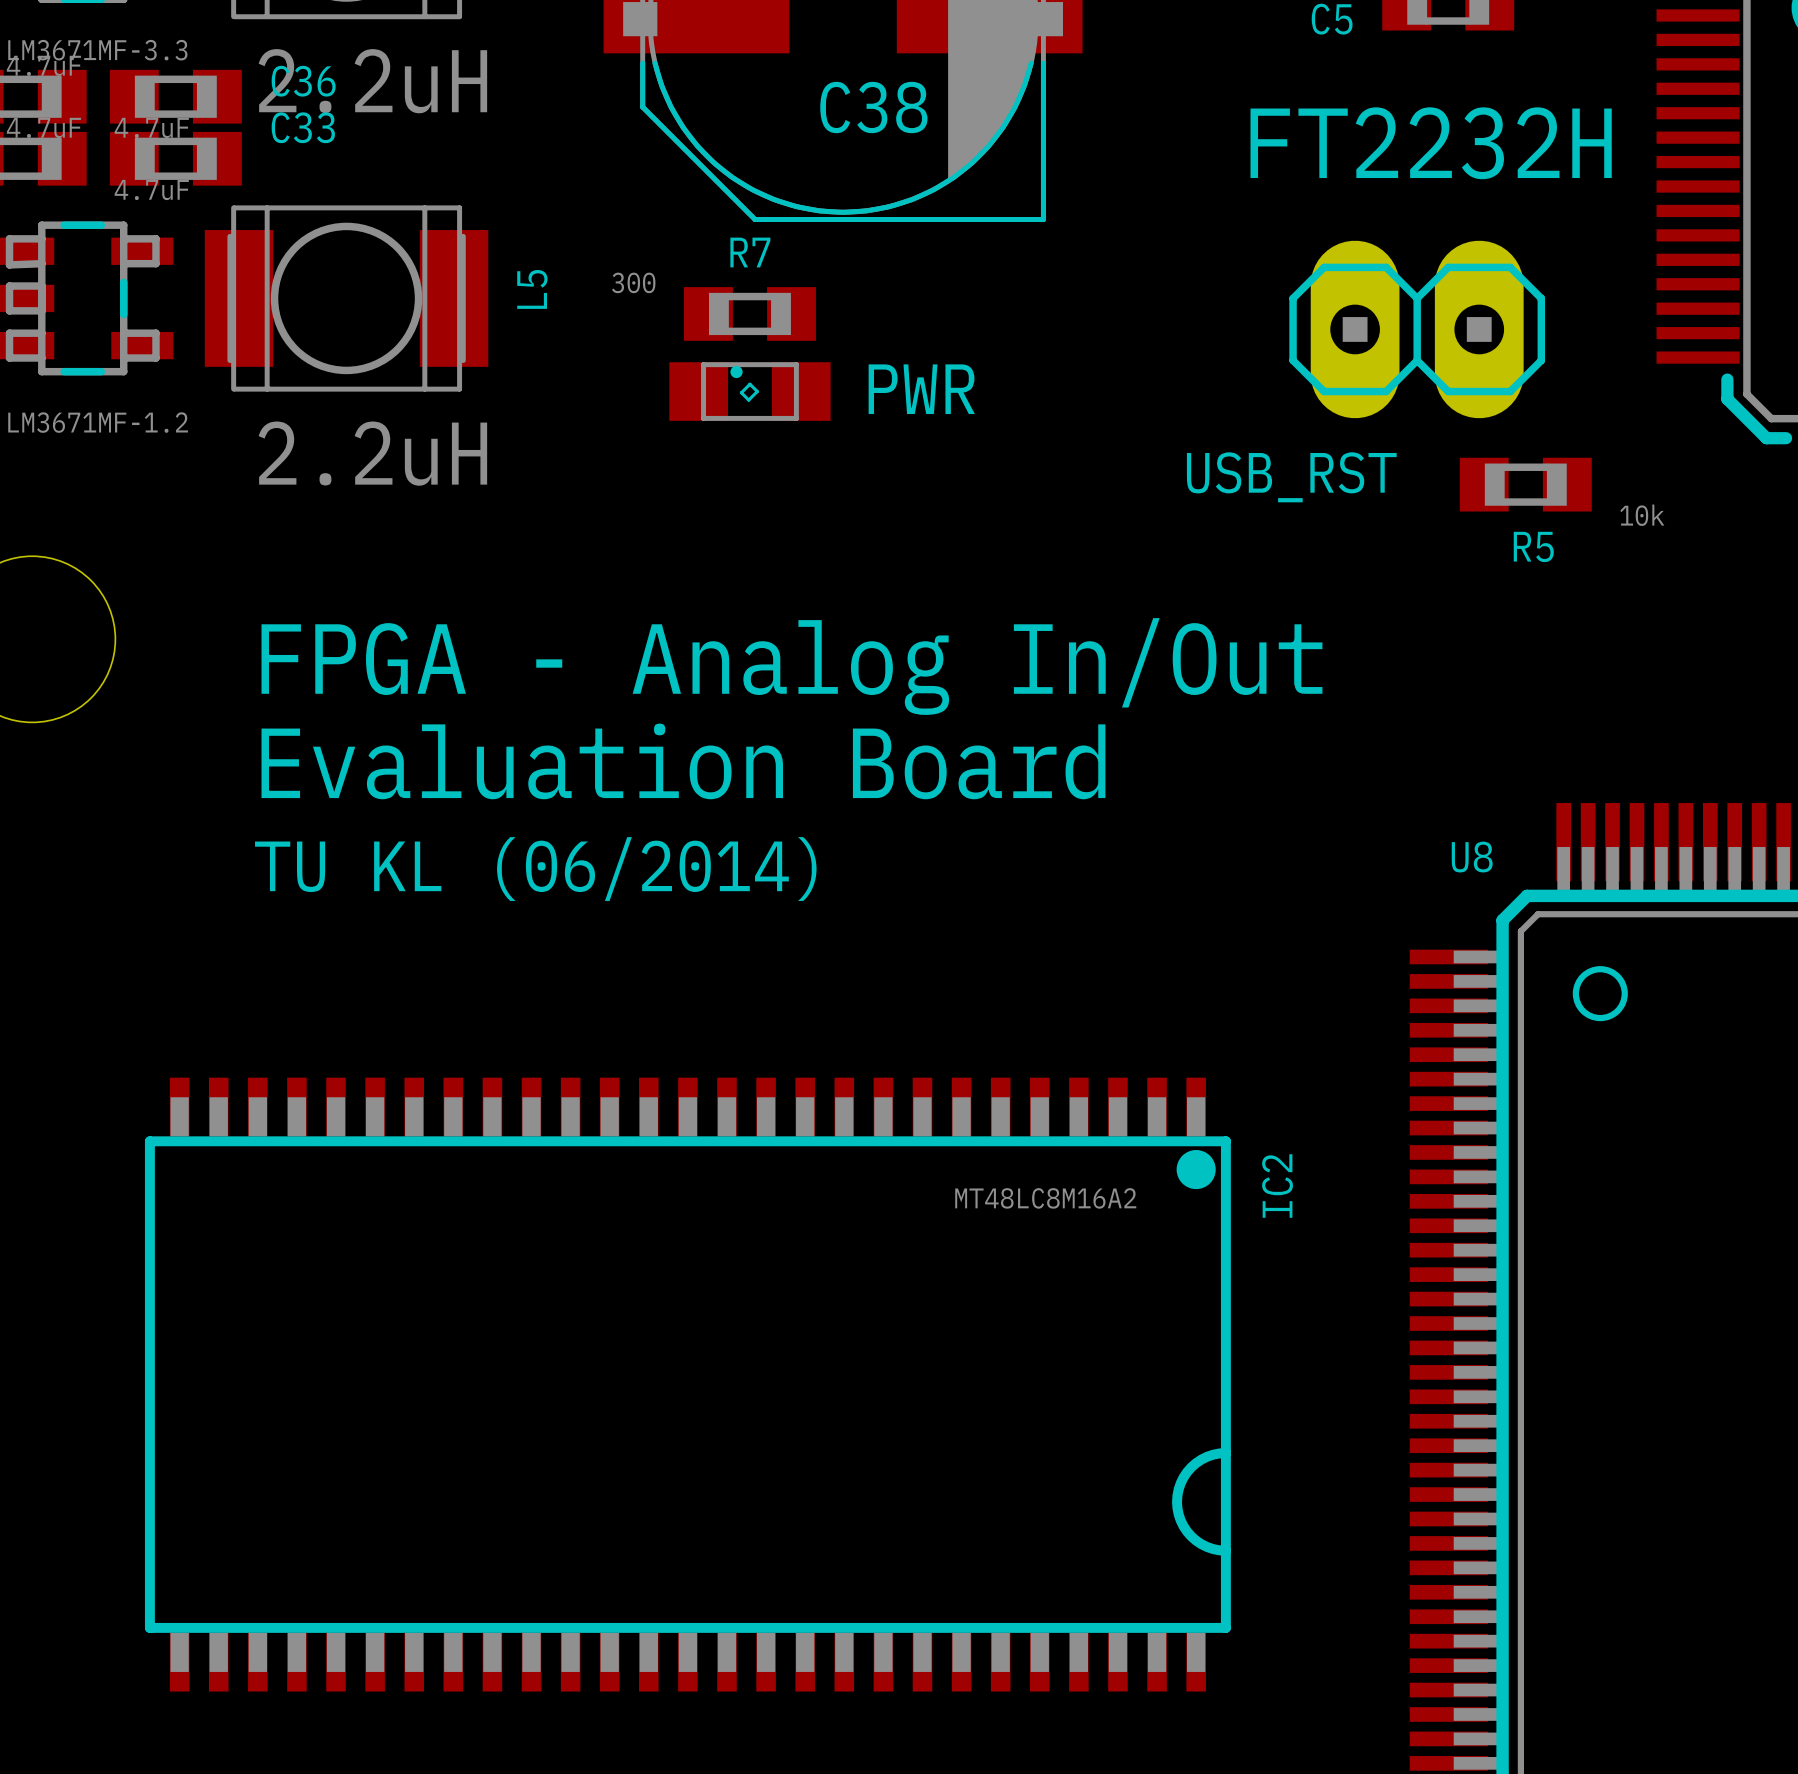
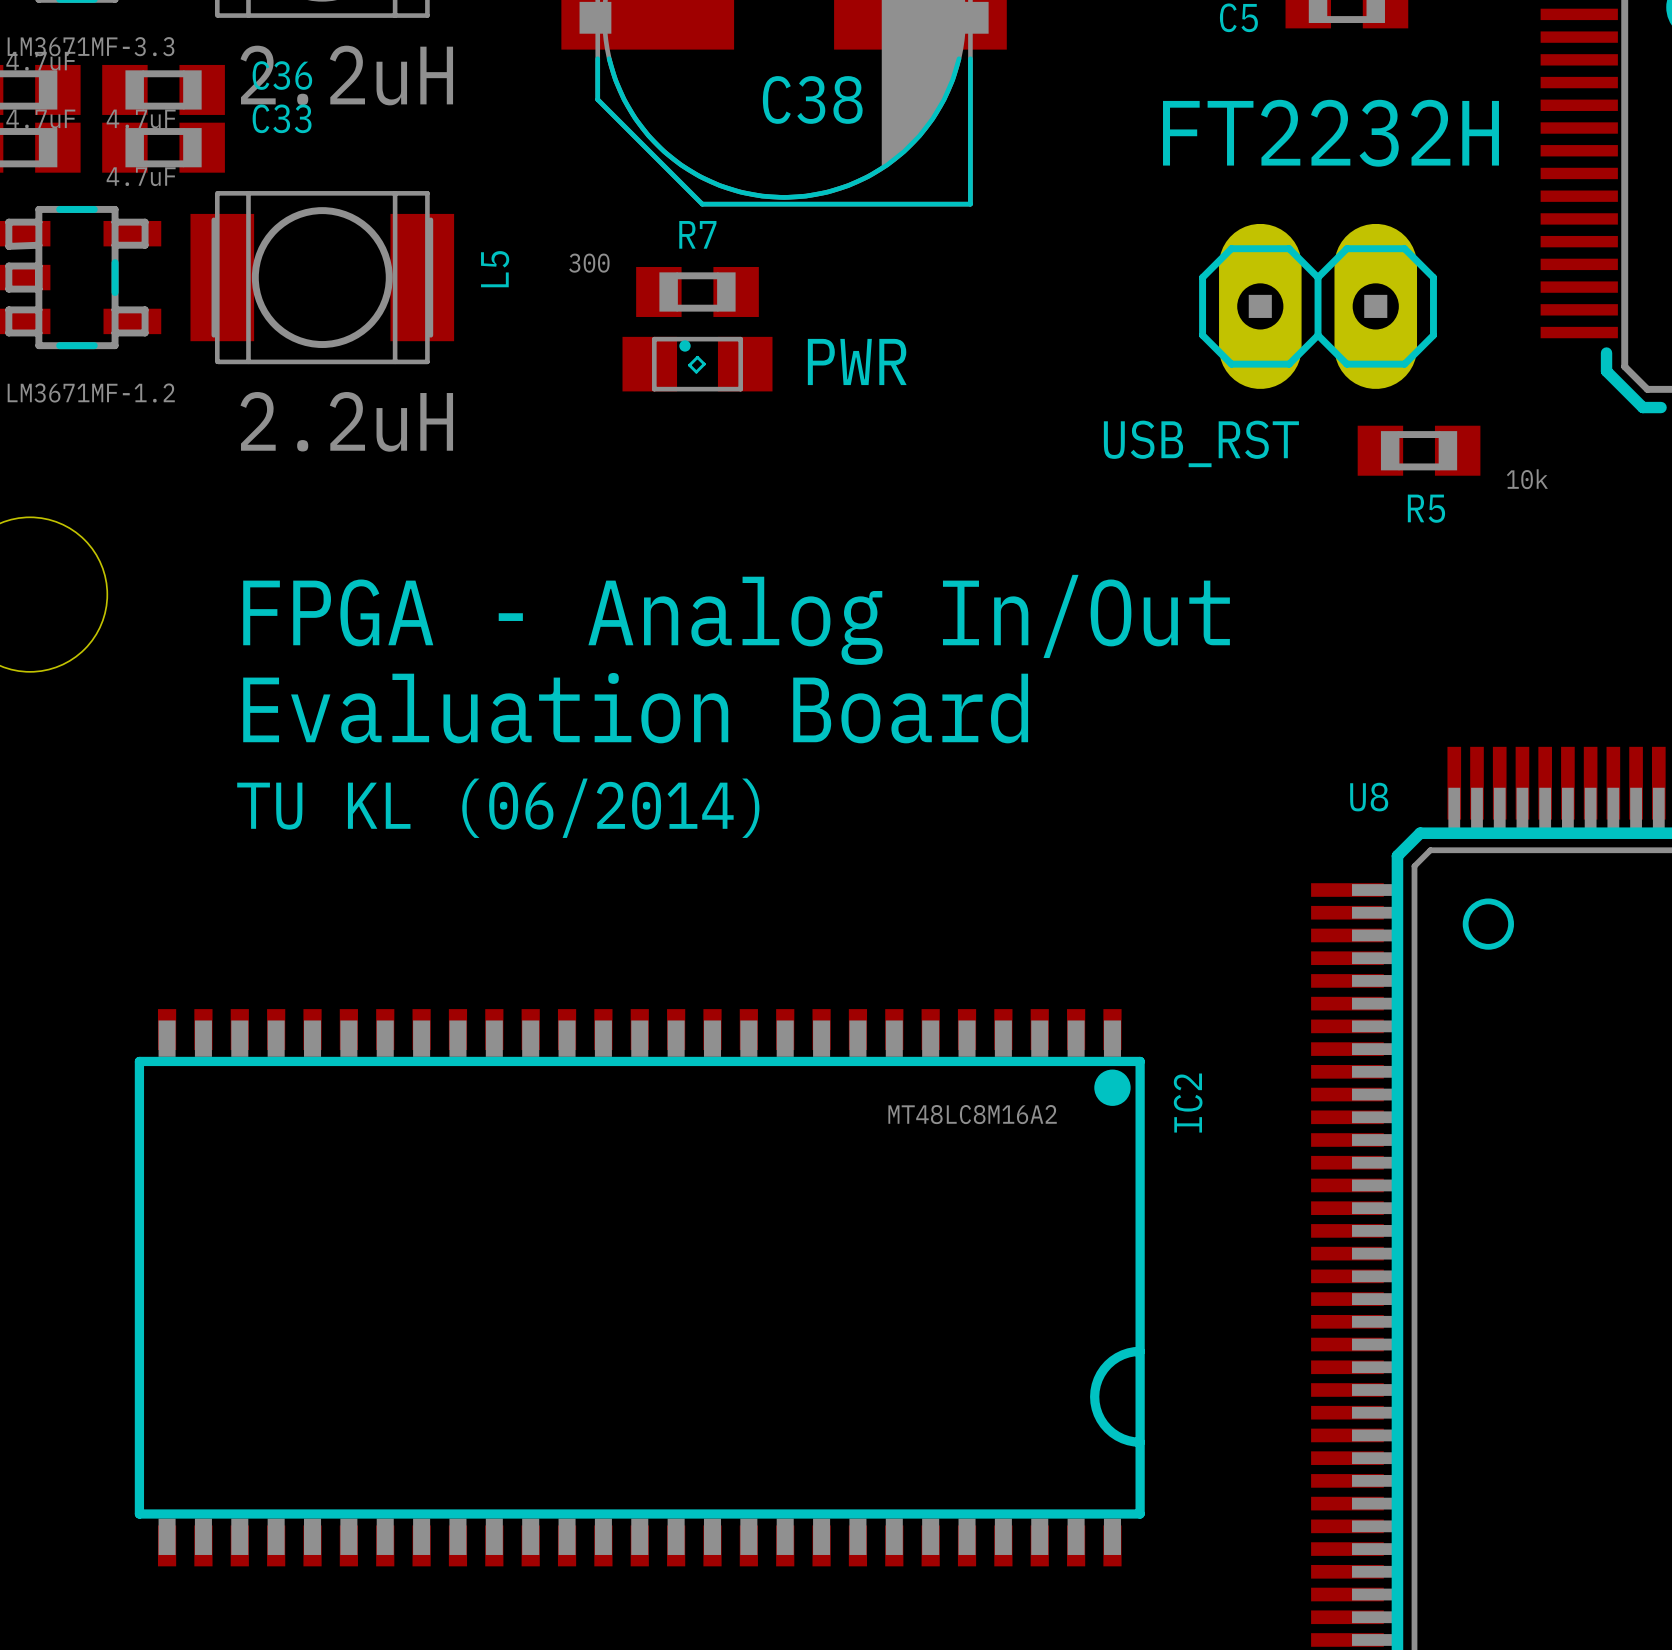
IC2 footprint: [144, 1077, 1231, 1692] -> [134, 1009, 1145, 1567]

